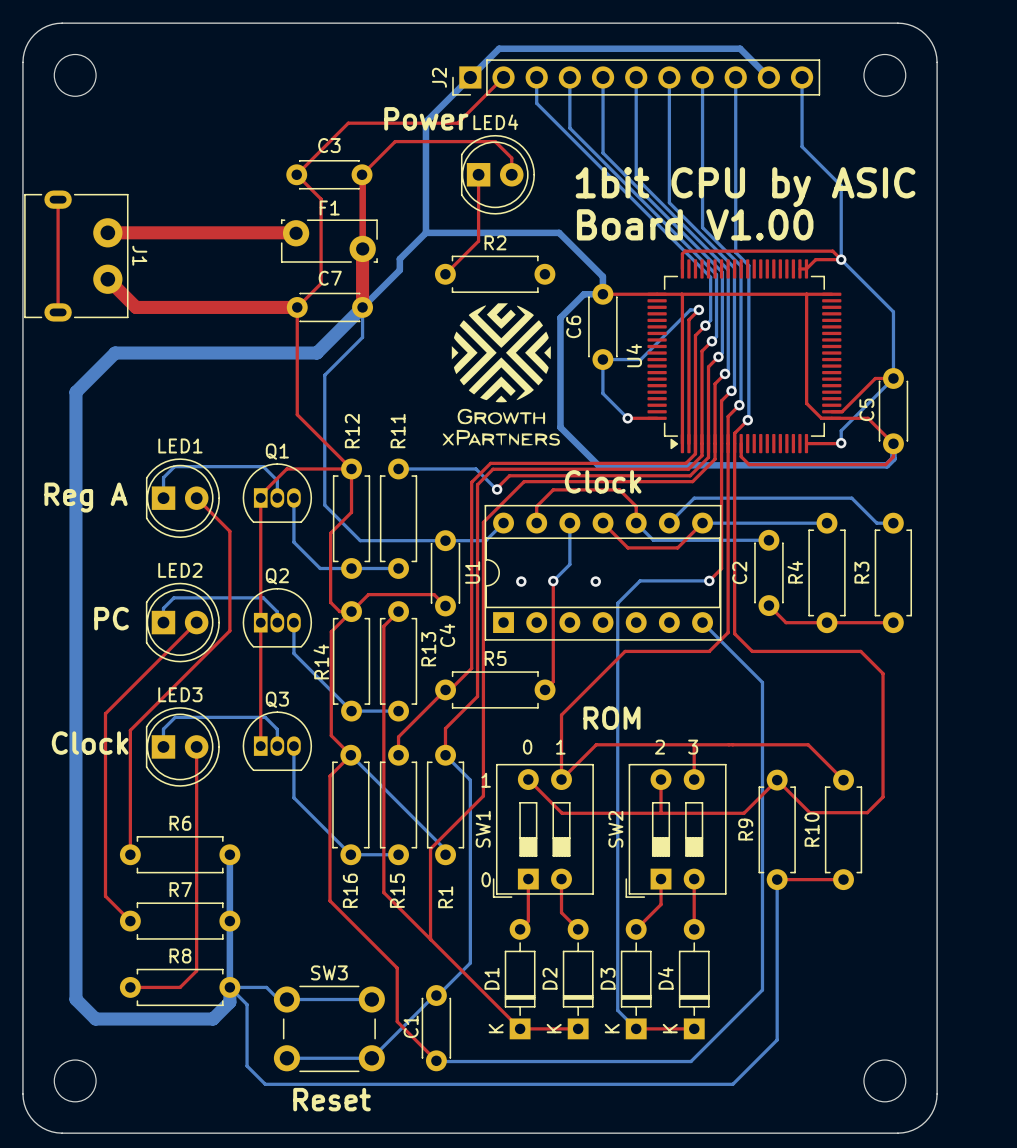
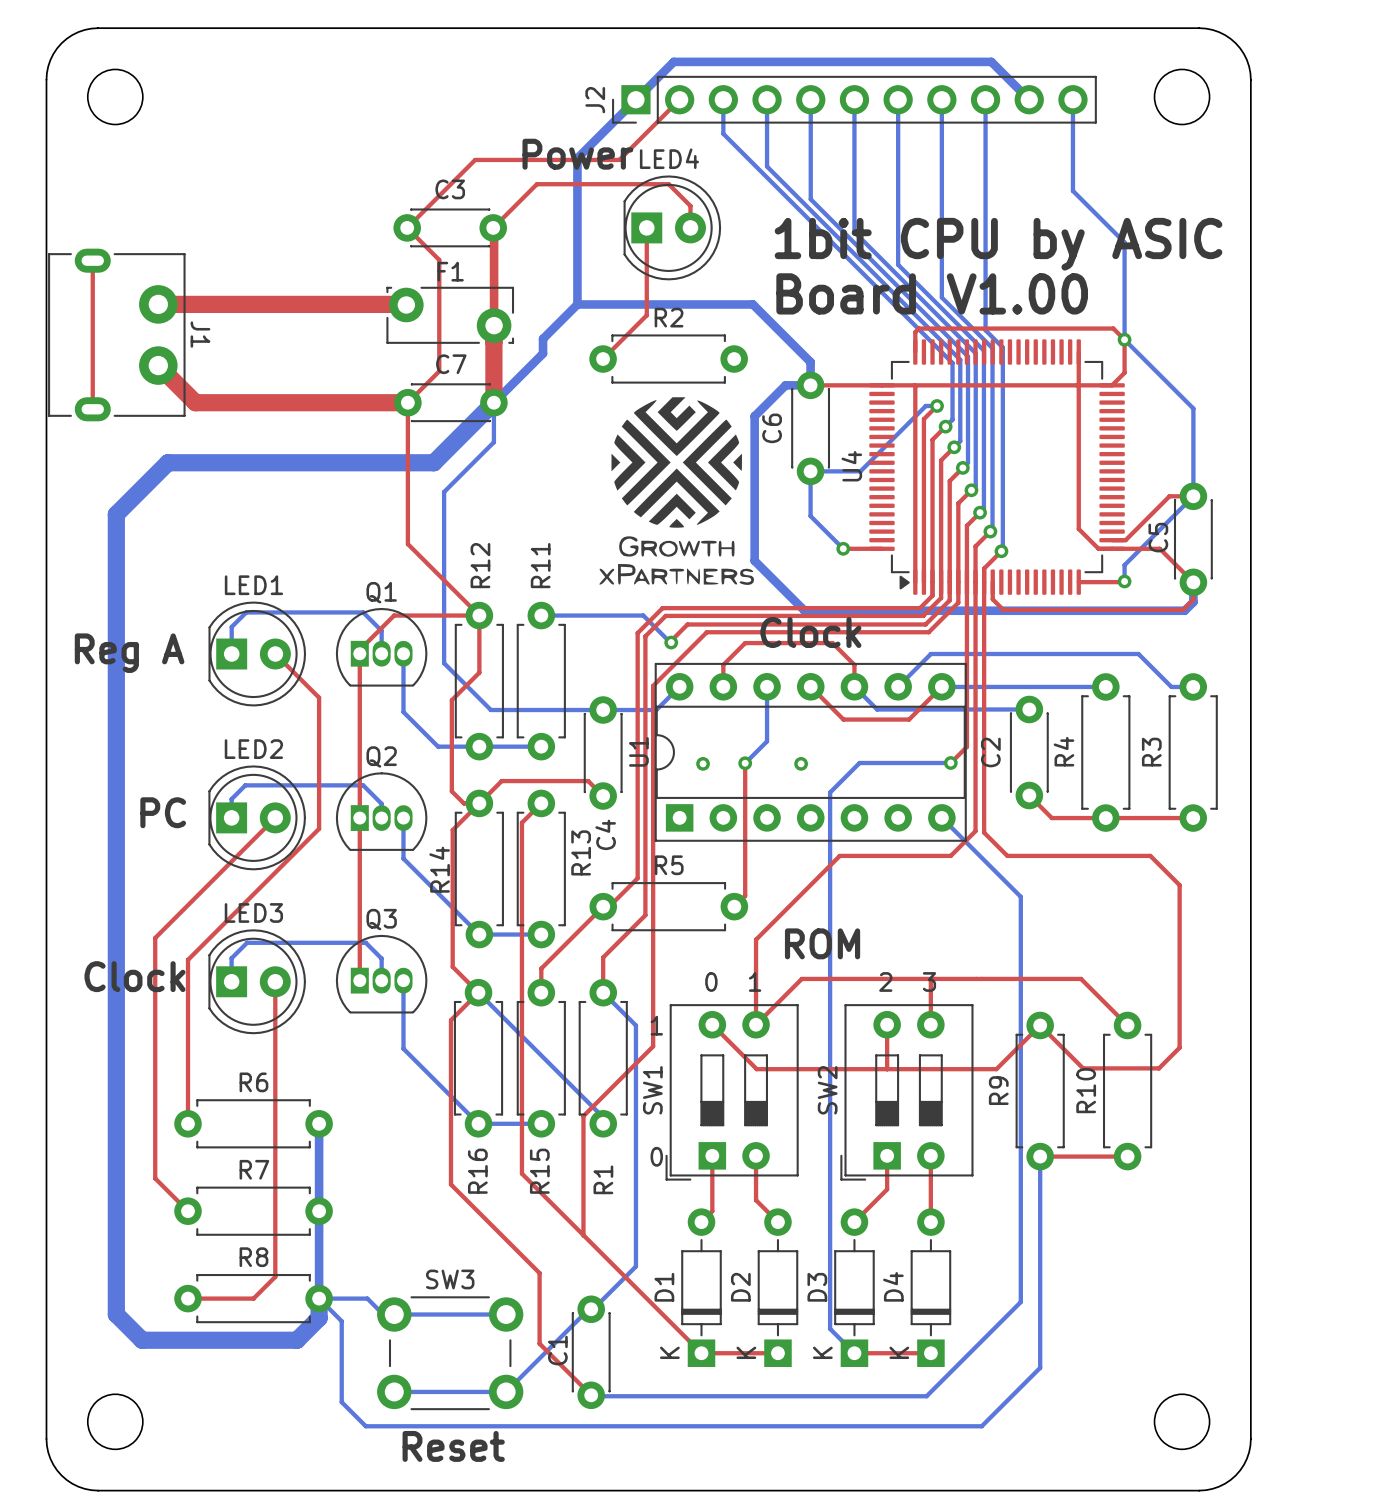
top track: (841, 259) (815, 259) (806, 268) (799, 268) -> (1124, 339) (1124, 372) (1112, 385)
top track: (806, 294) (806, 403) -> (1078, 352) (1078, 529)

